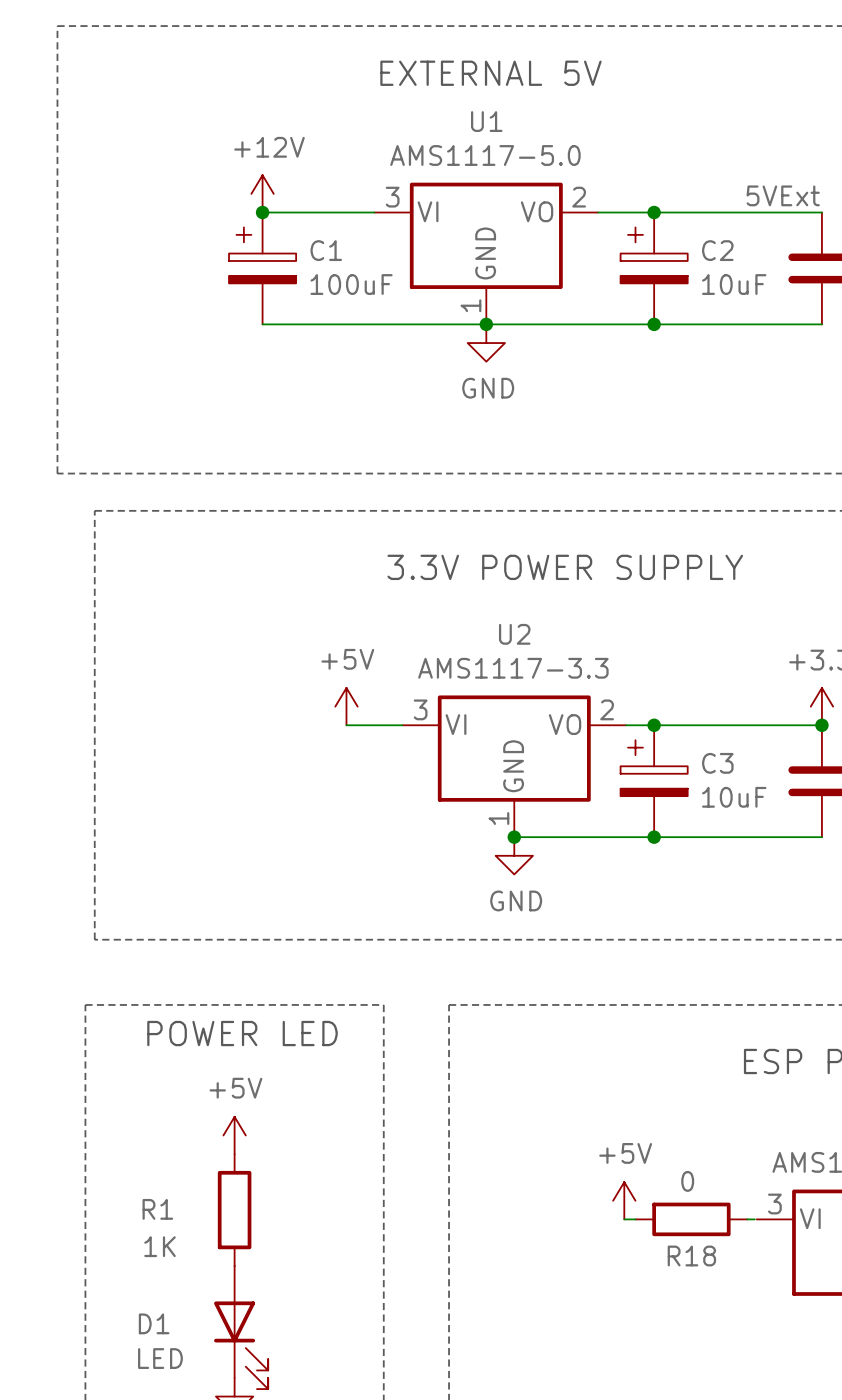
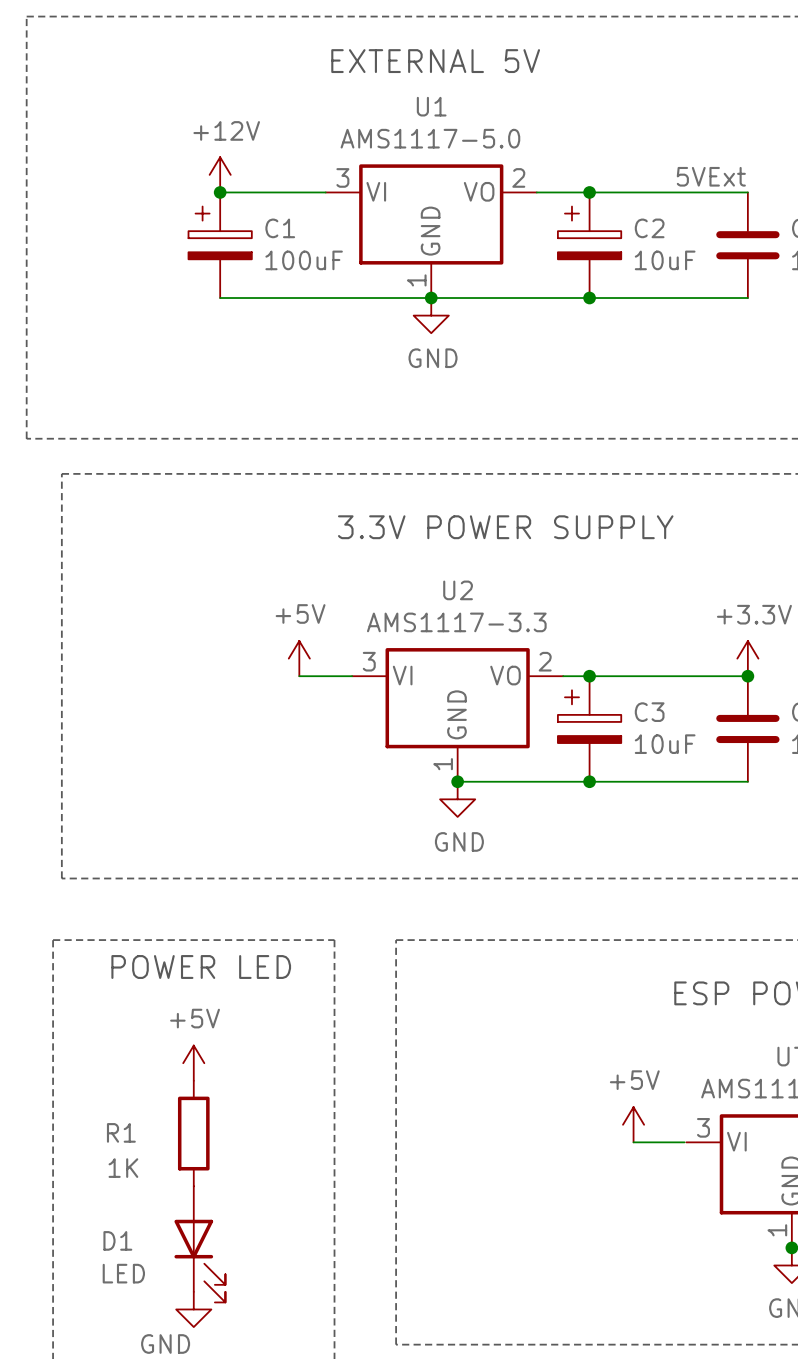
power symbol position: +5V (624, 1200) -> +5V (633, 1124)
wire: (624, 1219) (635, 1219) -> none
R18: 0 (691, 1219) -> none
wire: none -> (633, 1142) (677, 1142)

